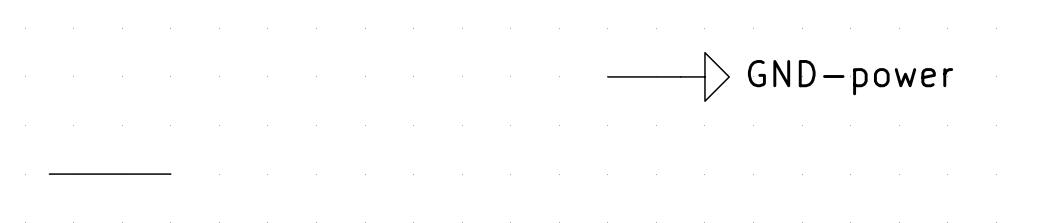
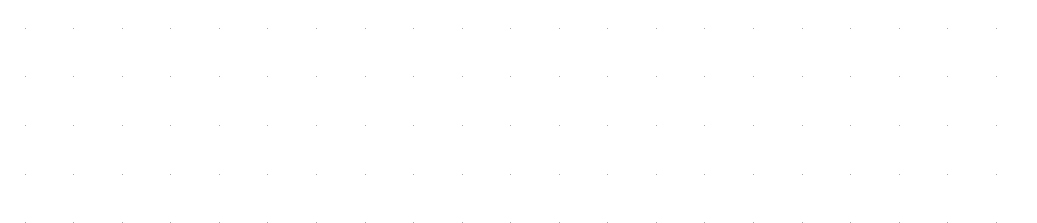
wire: (607, 76) (680, 76) -> none
power symbol: GND-power (704, 76) -> none
wire: (49, 174) (170, 174) -> none

